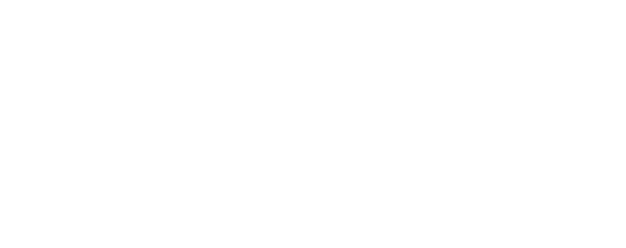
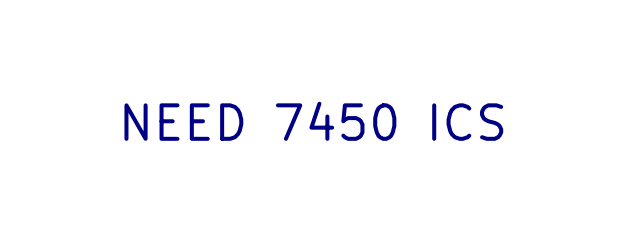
text: none -> NEED 7450 ICS (313, 121)

